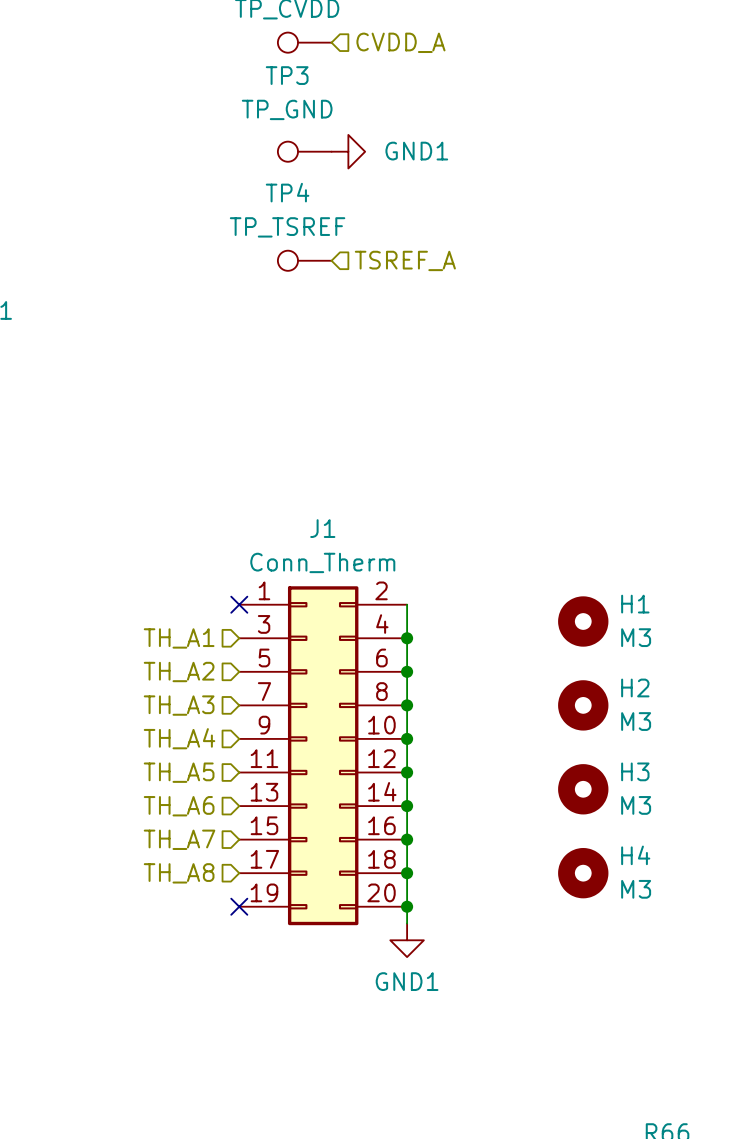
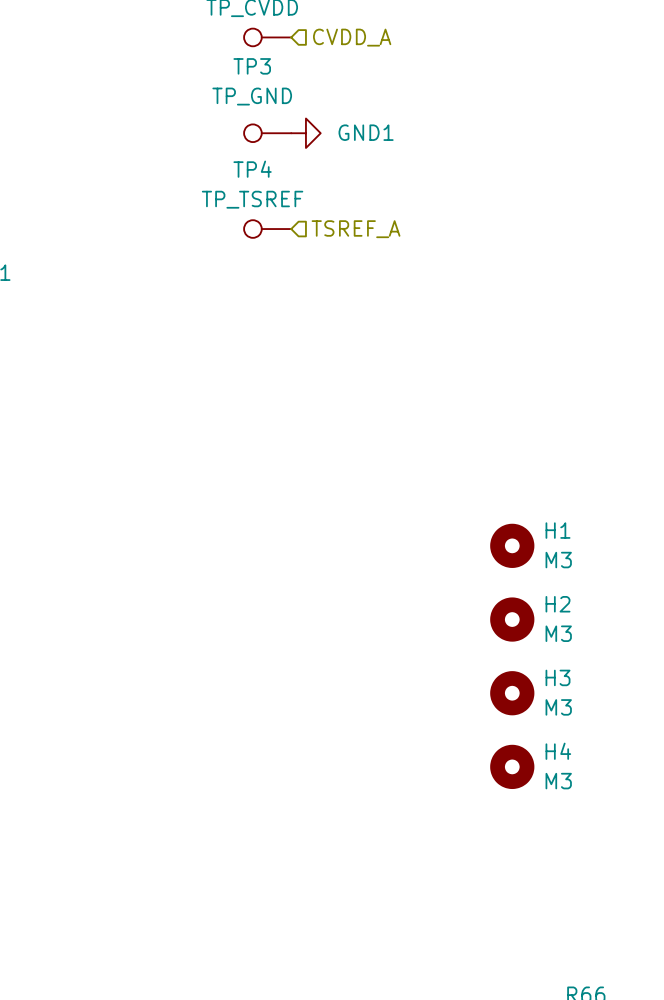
no-connect mark: (239, 604) -> none
wire: (407, 604) (407, 923) -> none
hierarchical label: TH_A1 (179, 638) -> none
junction: (407, 638) -> none
junction: (407, 671) -> none
hierarchical label: TH_A2 (179, 672) -> none
hierarchical label: TH_A3 (179, 705) -> none
junction: (407, 705) -> none
hierarchical label: TH_A4 (179, 738) -> none
junction: (407, 738) -> none
J1: Conn_Therm (323, 755) -> none
hierarchical label: TH_A5 (179, 772) -> none
junction: (407, 772) -> none
hierarchical label: TH_A6 (179, 806) -> none
junction: (407, 806) -> none
hierarchical label: TH_A7 (179, 839) -> none
junction: (407, 839) -> none
hierarchical label: TH_A8 (179, 873) -> none
junction: (407, 873) -> none
no-connect mark: (239, 906) -> none
junction: (407, 906) -> none
power symbol: GND1 (407, 940) -> none

